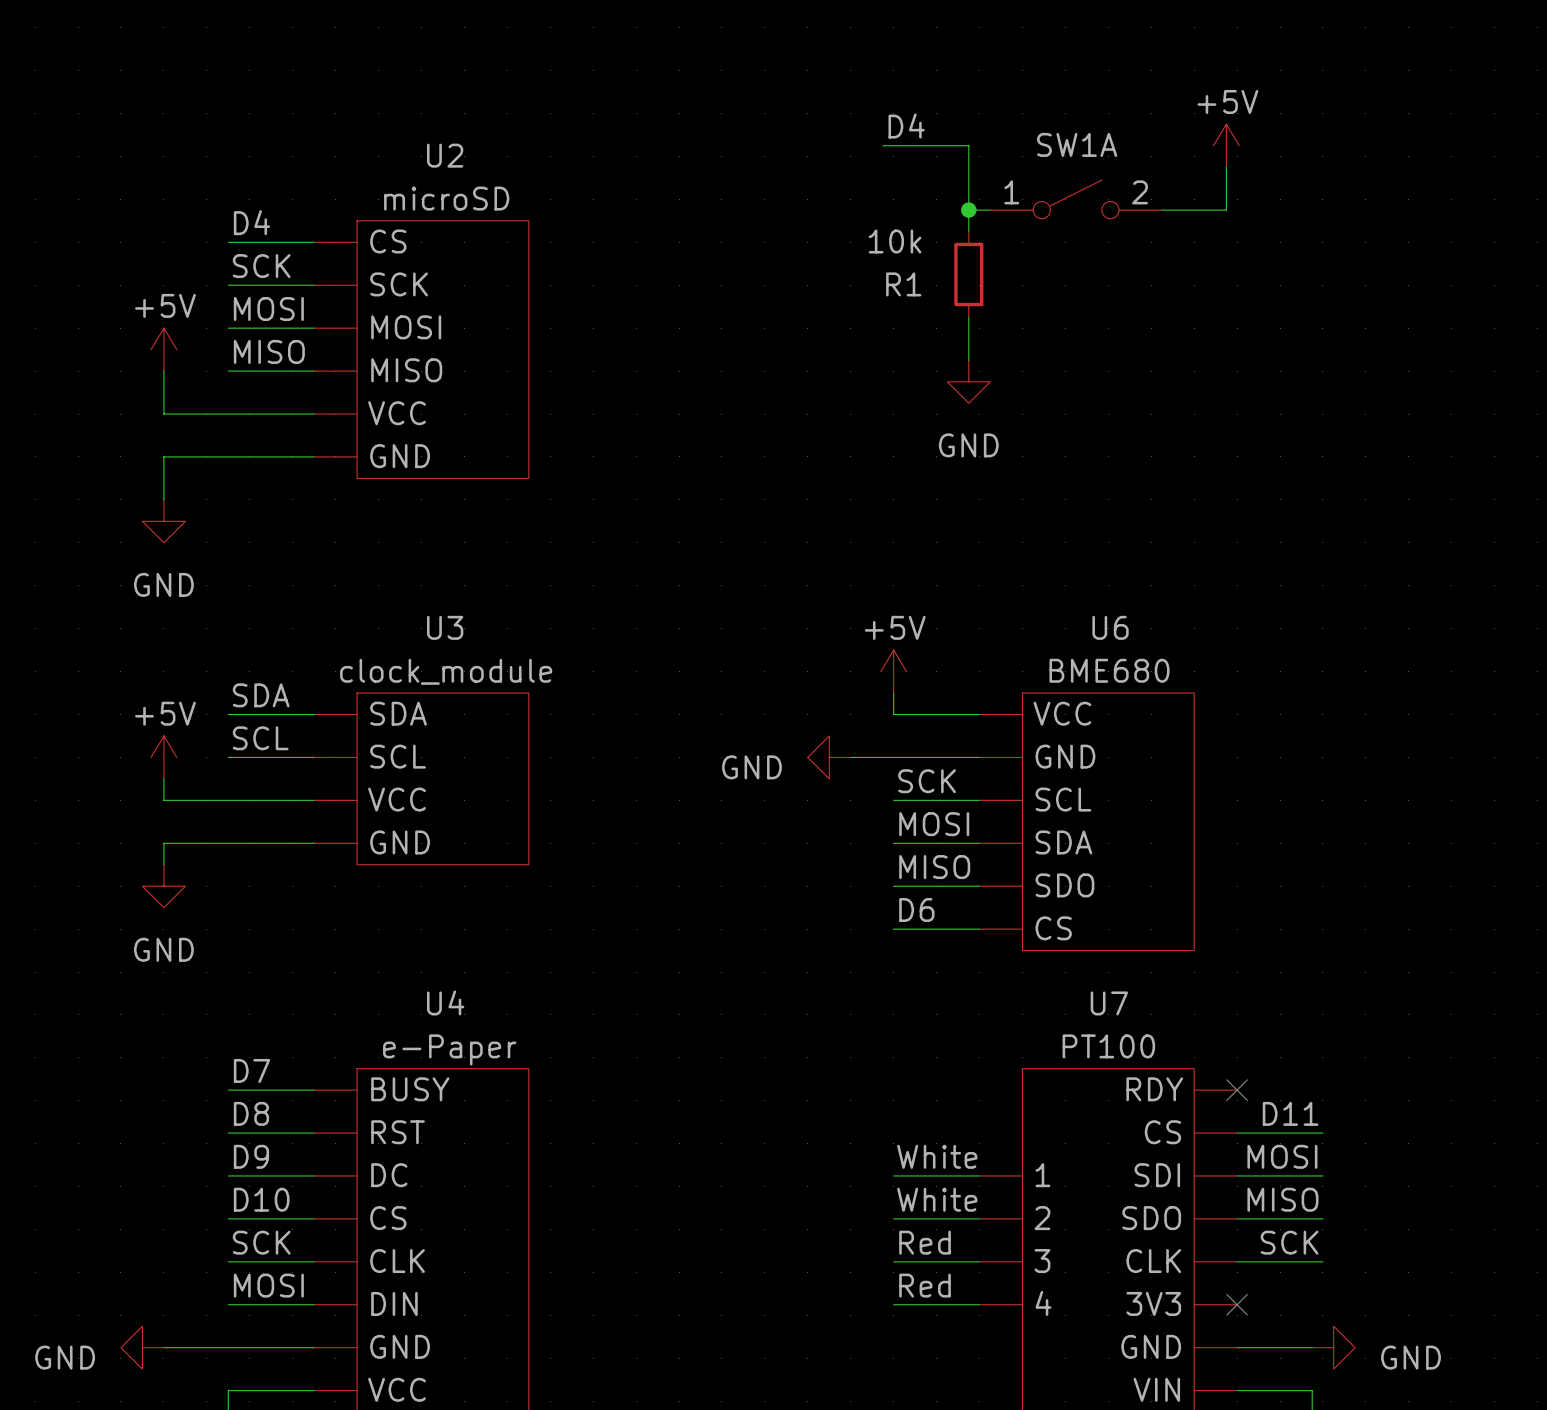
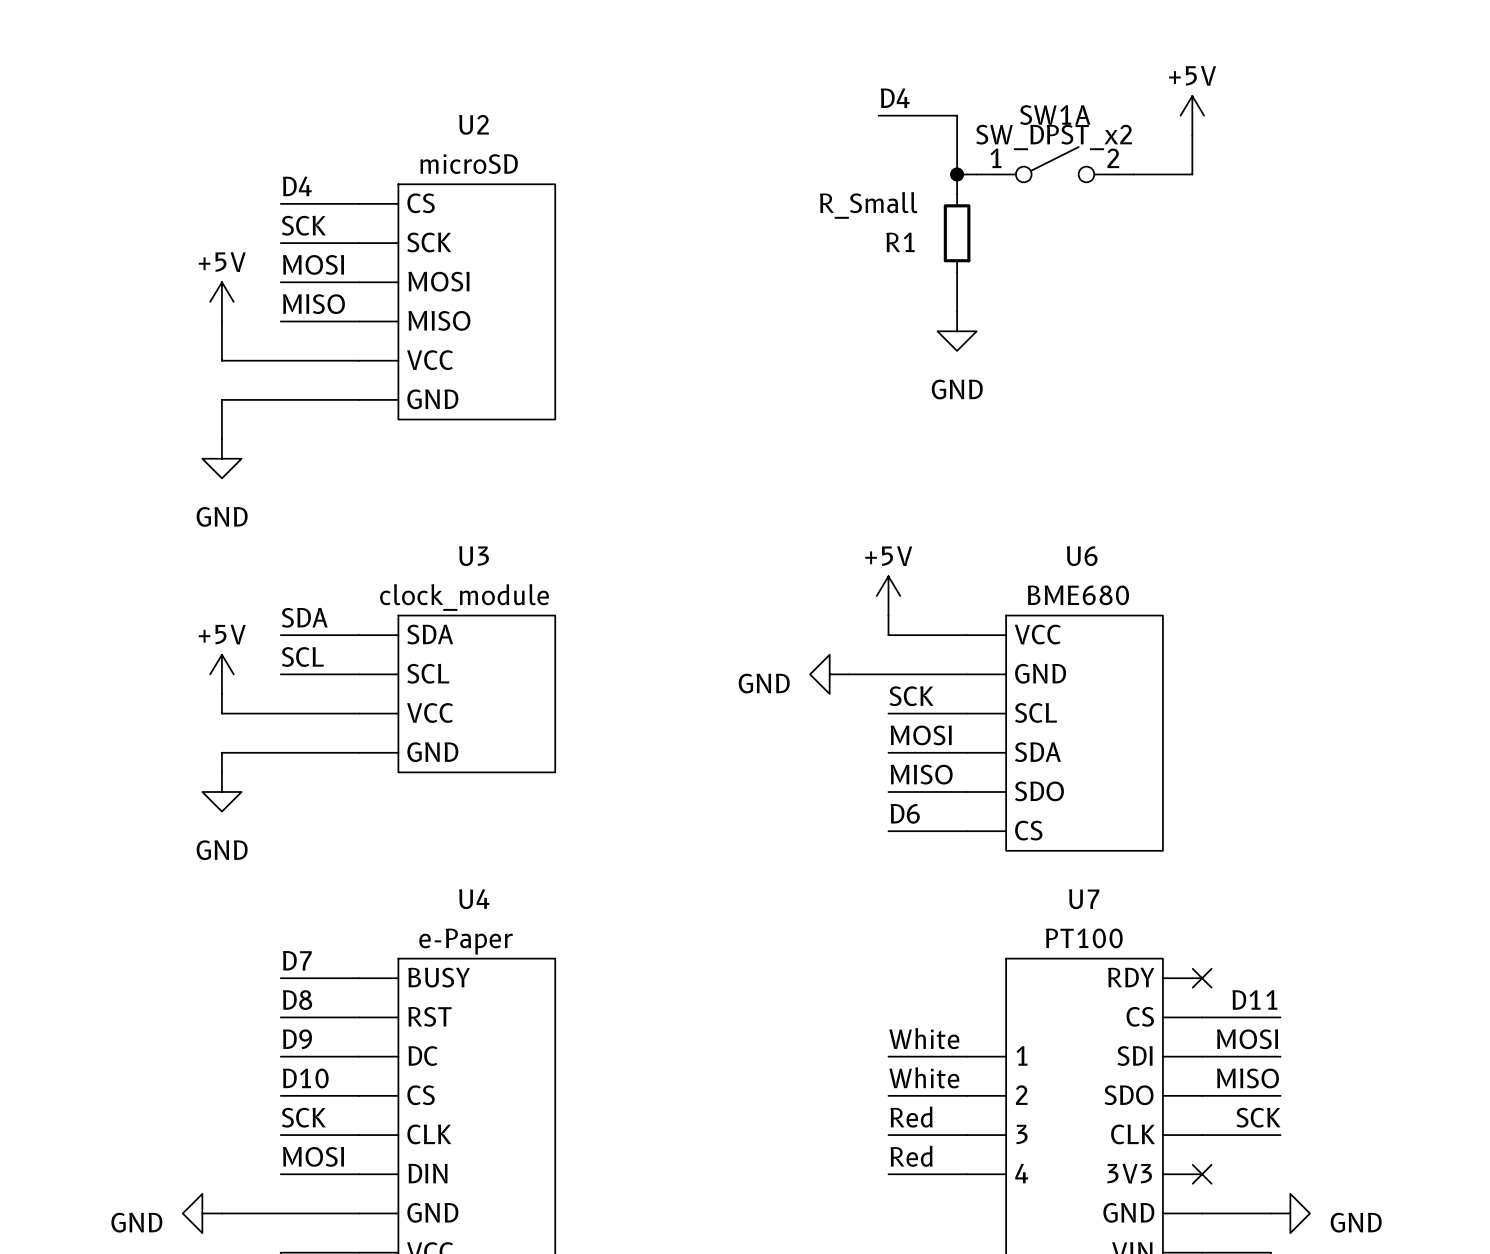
SW1A value: none -> SW_DPST_x2 (1054, 137)
R1 value: 10k (895, 241) -> R_Small (868, 205)

